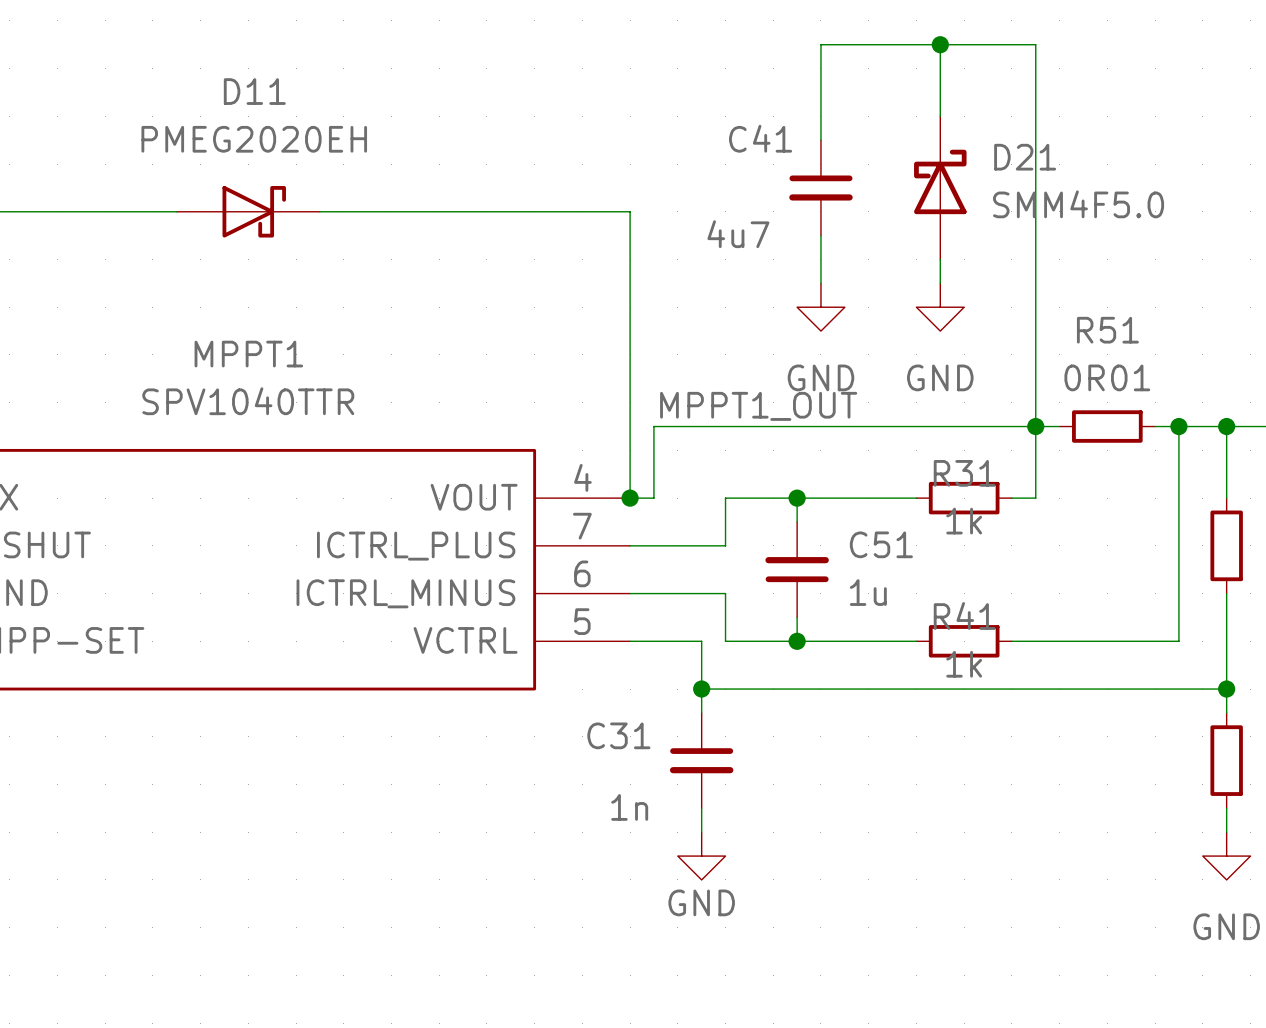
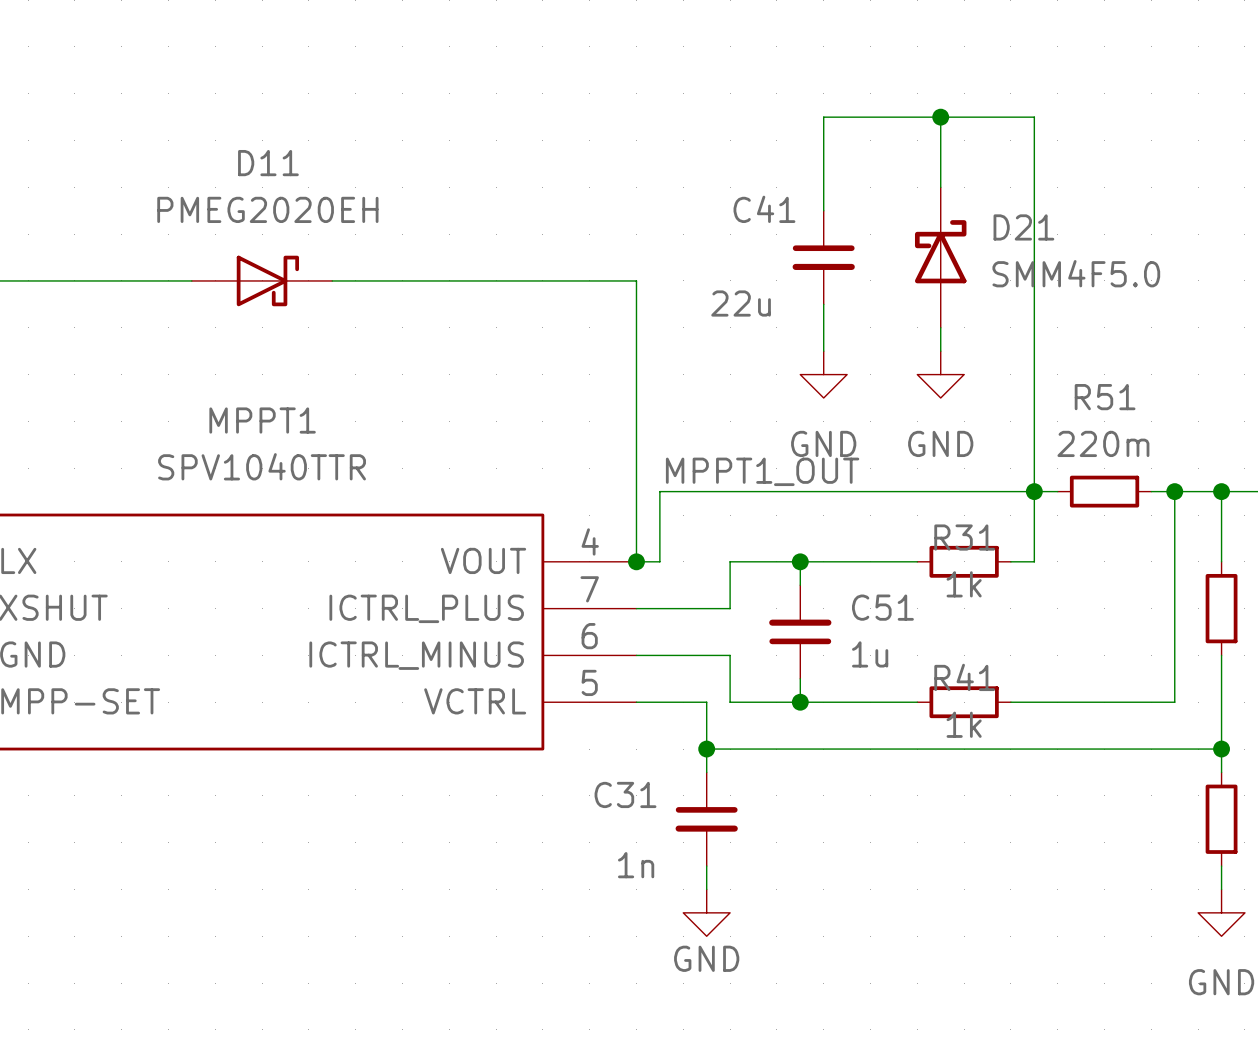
C41 value: 4u7 (738, 234) -> 22u (741, 303)
R51 value: 0R01 (1107, 377) -> 220m (1103, 443)

